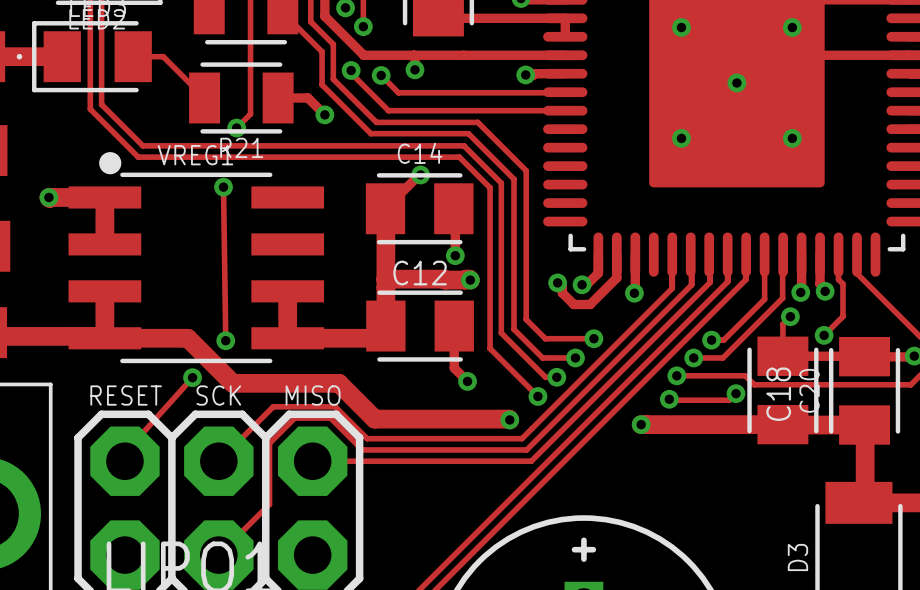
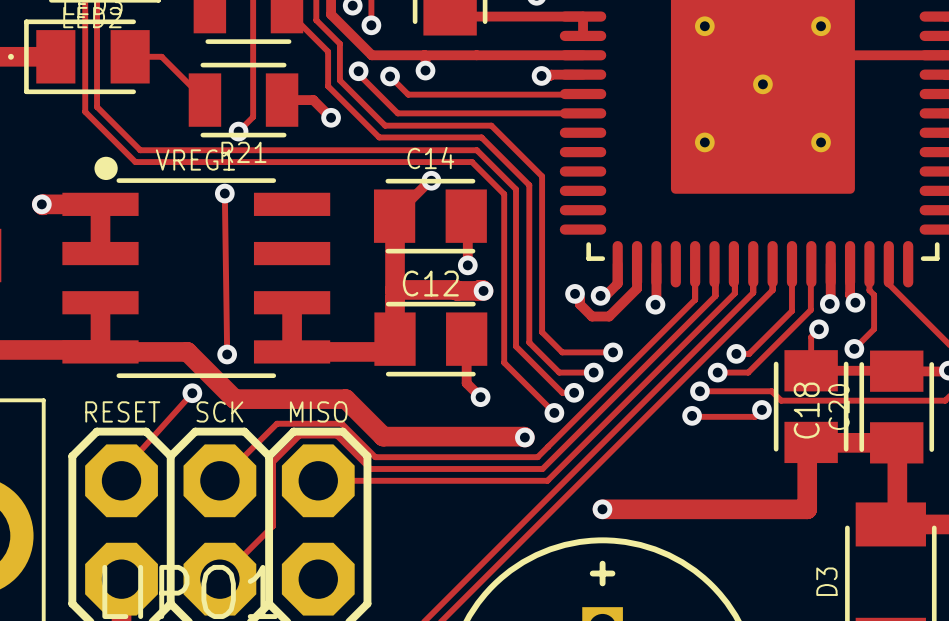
track: (641, 424) (796, 424) -> none
via position: (641, 424) -> (602, 509)
track: none -> (811, 442) (807, 446) (807, 509) (602, 509)

